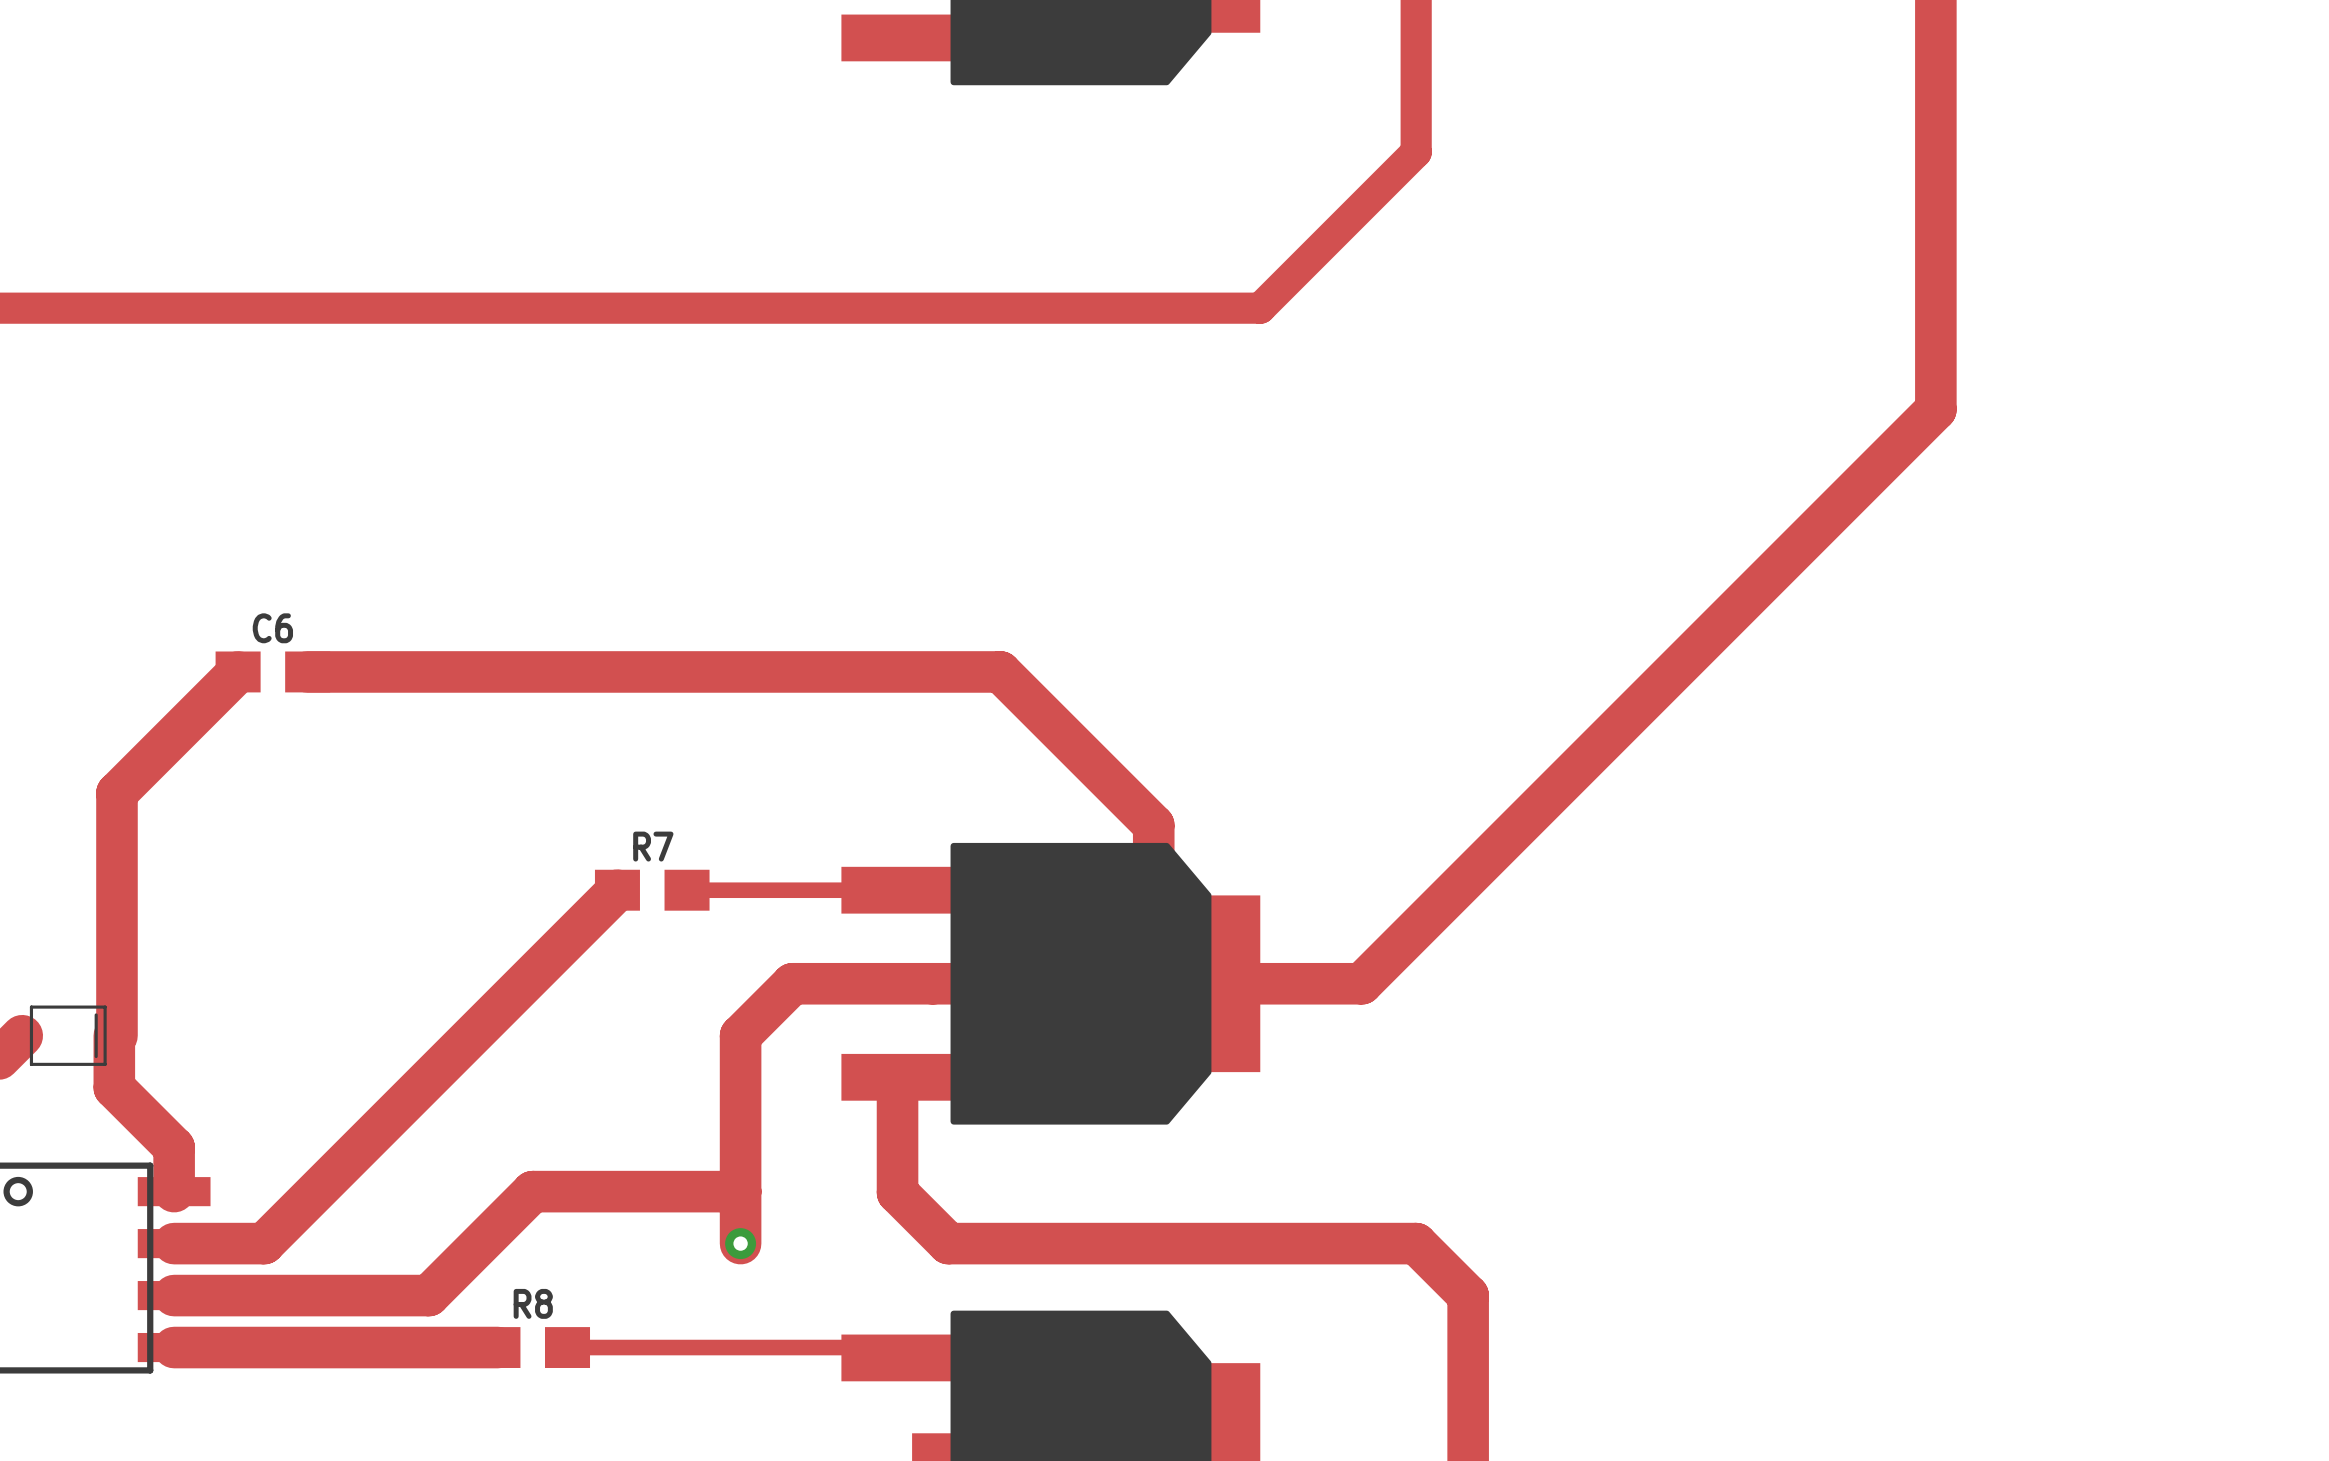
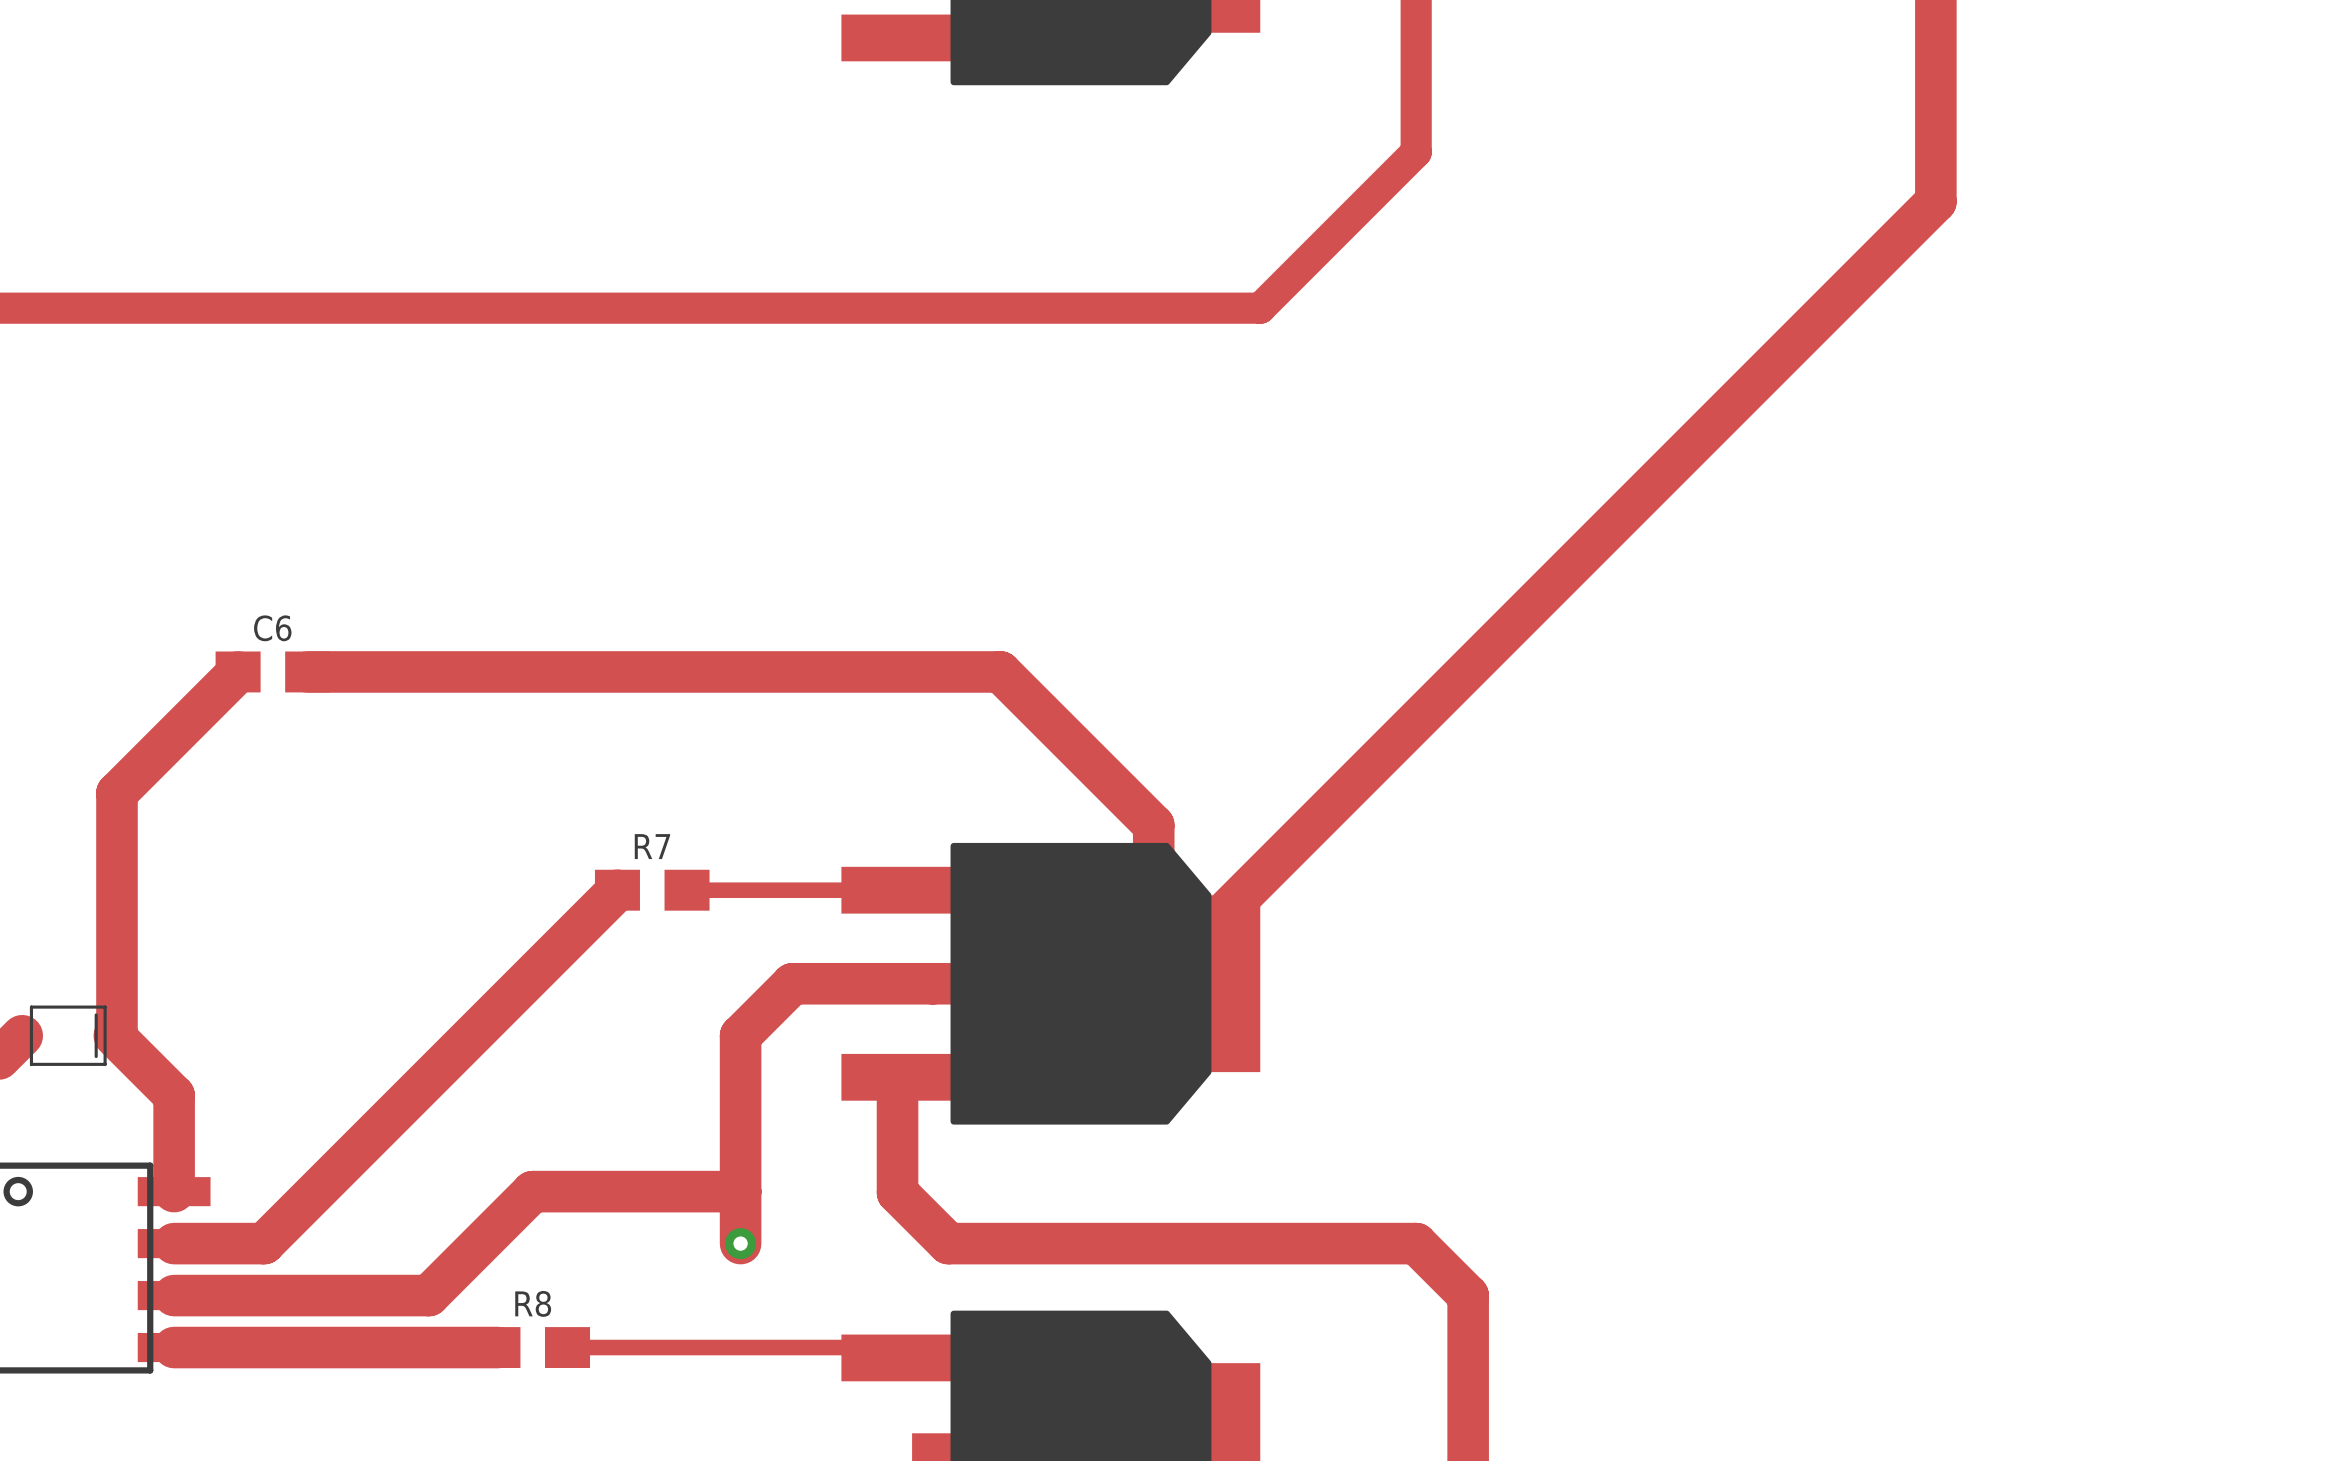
track: (1935, 201) (1935, 409) (1361, 983) (1153, 983) -> (1935, 201) (1153, 983)
track: (114, 1035) (114, 1087) (174, 1147) -> (114, 1035) (174, 1095) (174, 1147)

